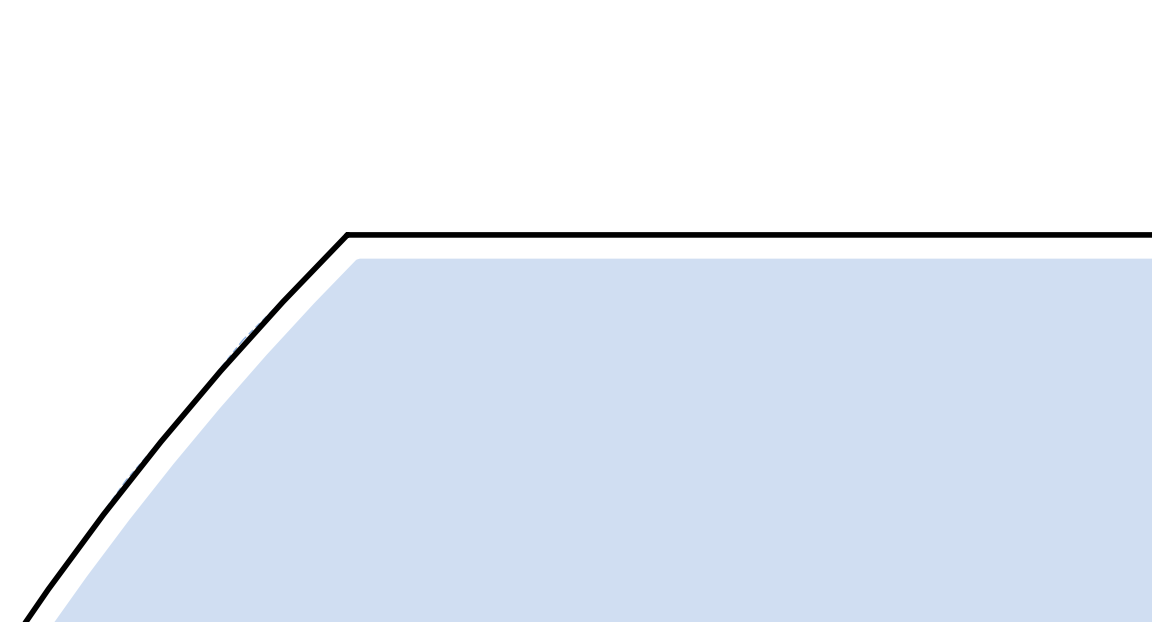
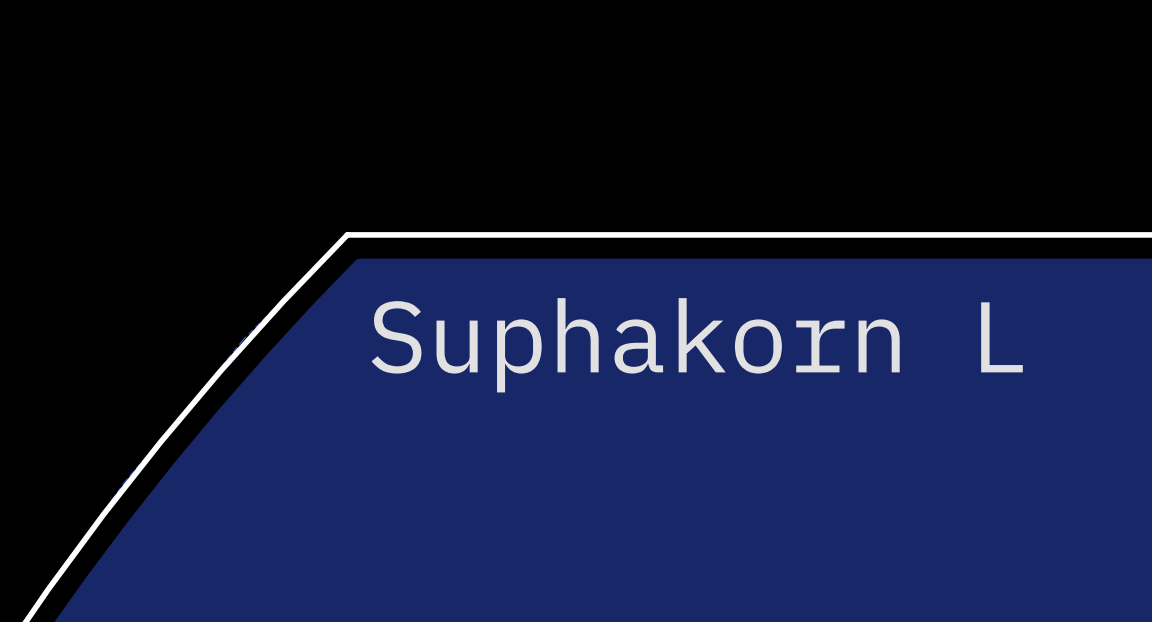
text: none -> Suphakorn L (697, 345)

